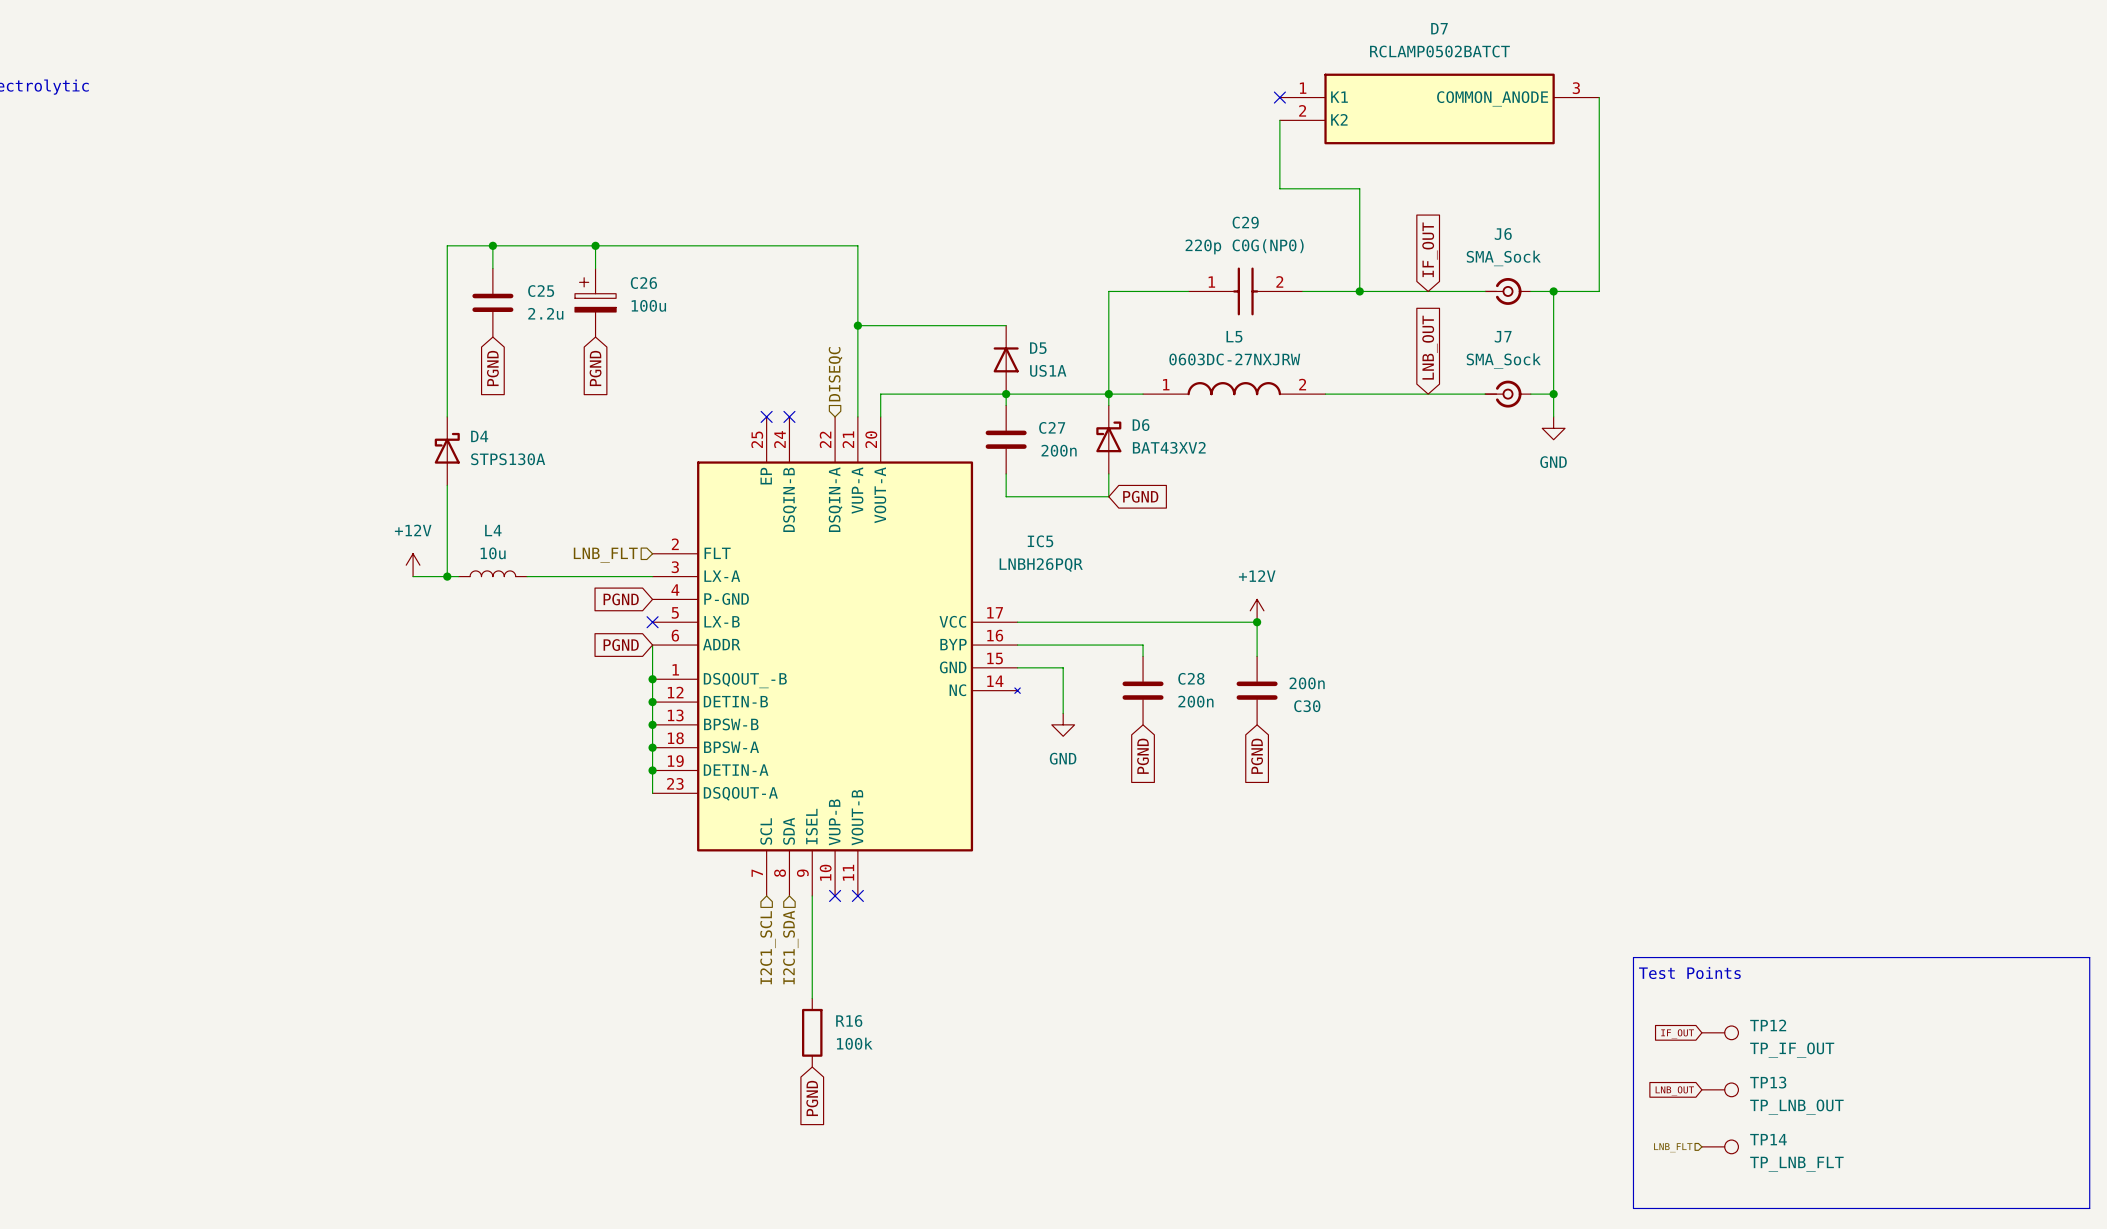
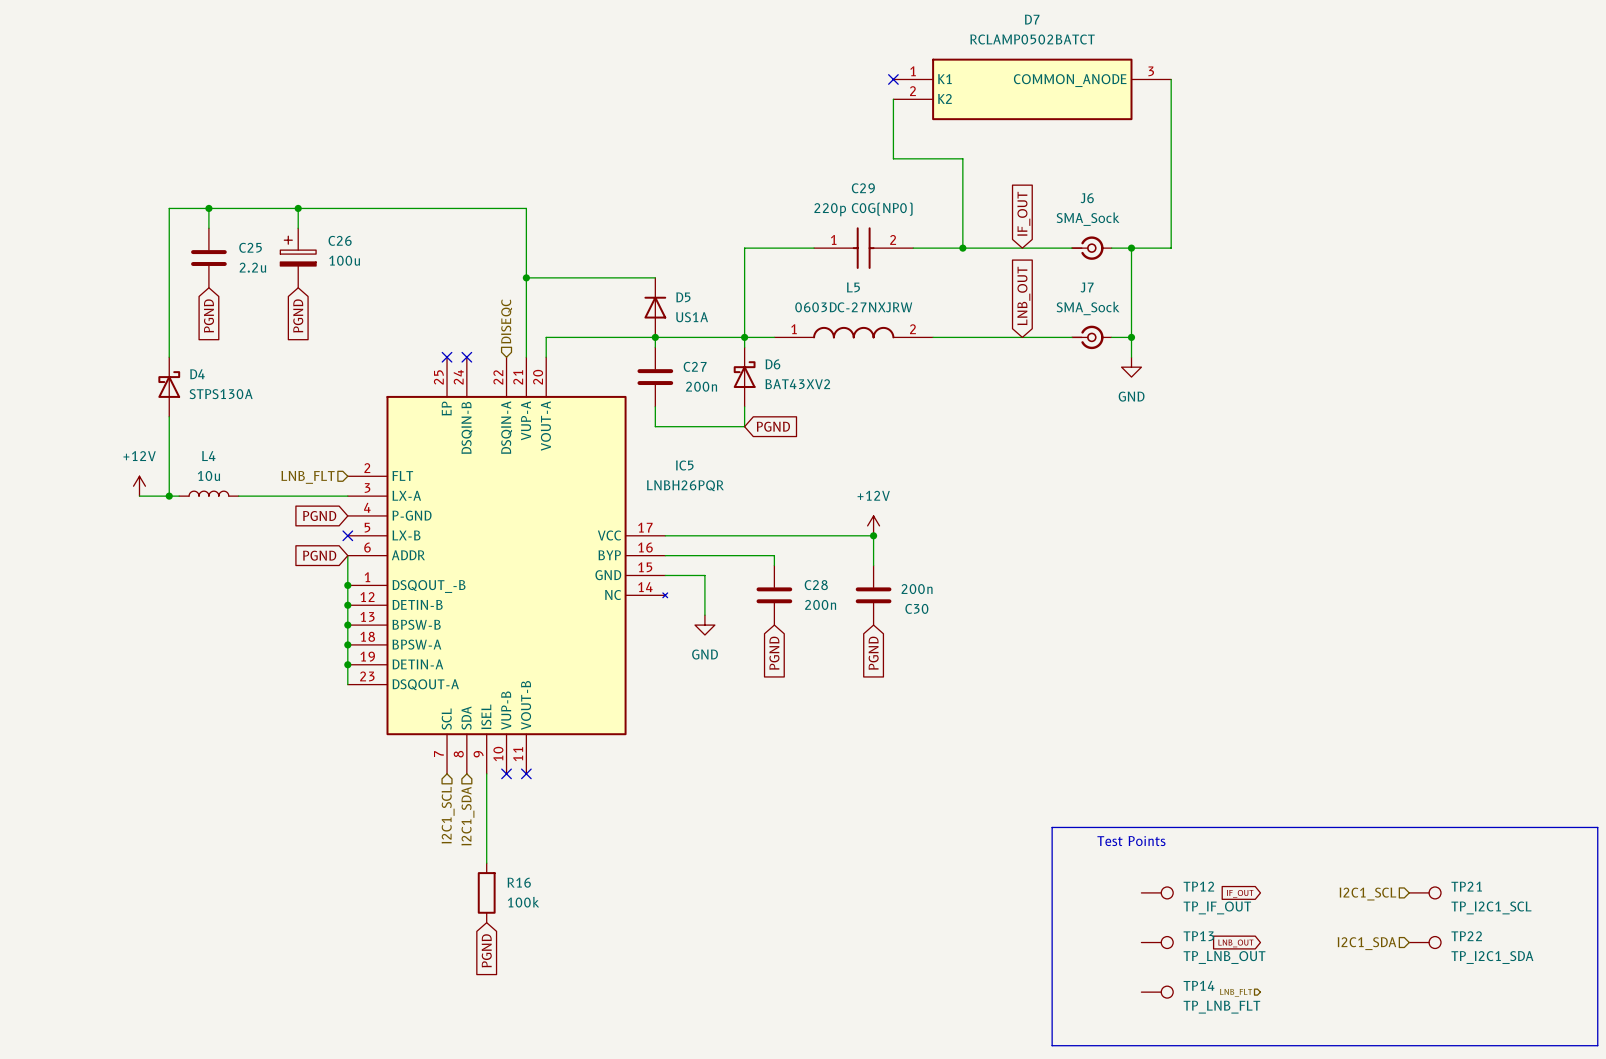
line: (1633, 957) (1633, 1208) -> (1200, 827) (1052, 827) (1052, 1045) (1200, 1045)
text position: Test Points (1689, 973) -> Test Points (1131, 841)
TP12 position: (1720, 1032) -> (1157, 892)
TP21: none -> TP_I2C1_SCL (1425, 892)
hierarchical label: none -> I2C1_SCL (1367, 894)
TP13 position: (1720, 1089) -> (1157, 942)
TP22: none -> TP_I2C1_SDA (1425, 942)
hierarchical label: none -> I2C1_SDA (1366, 943)
TP14 position: (1720, 1146) -> (1157, 992)

